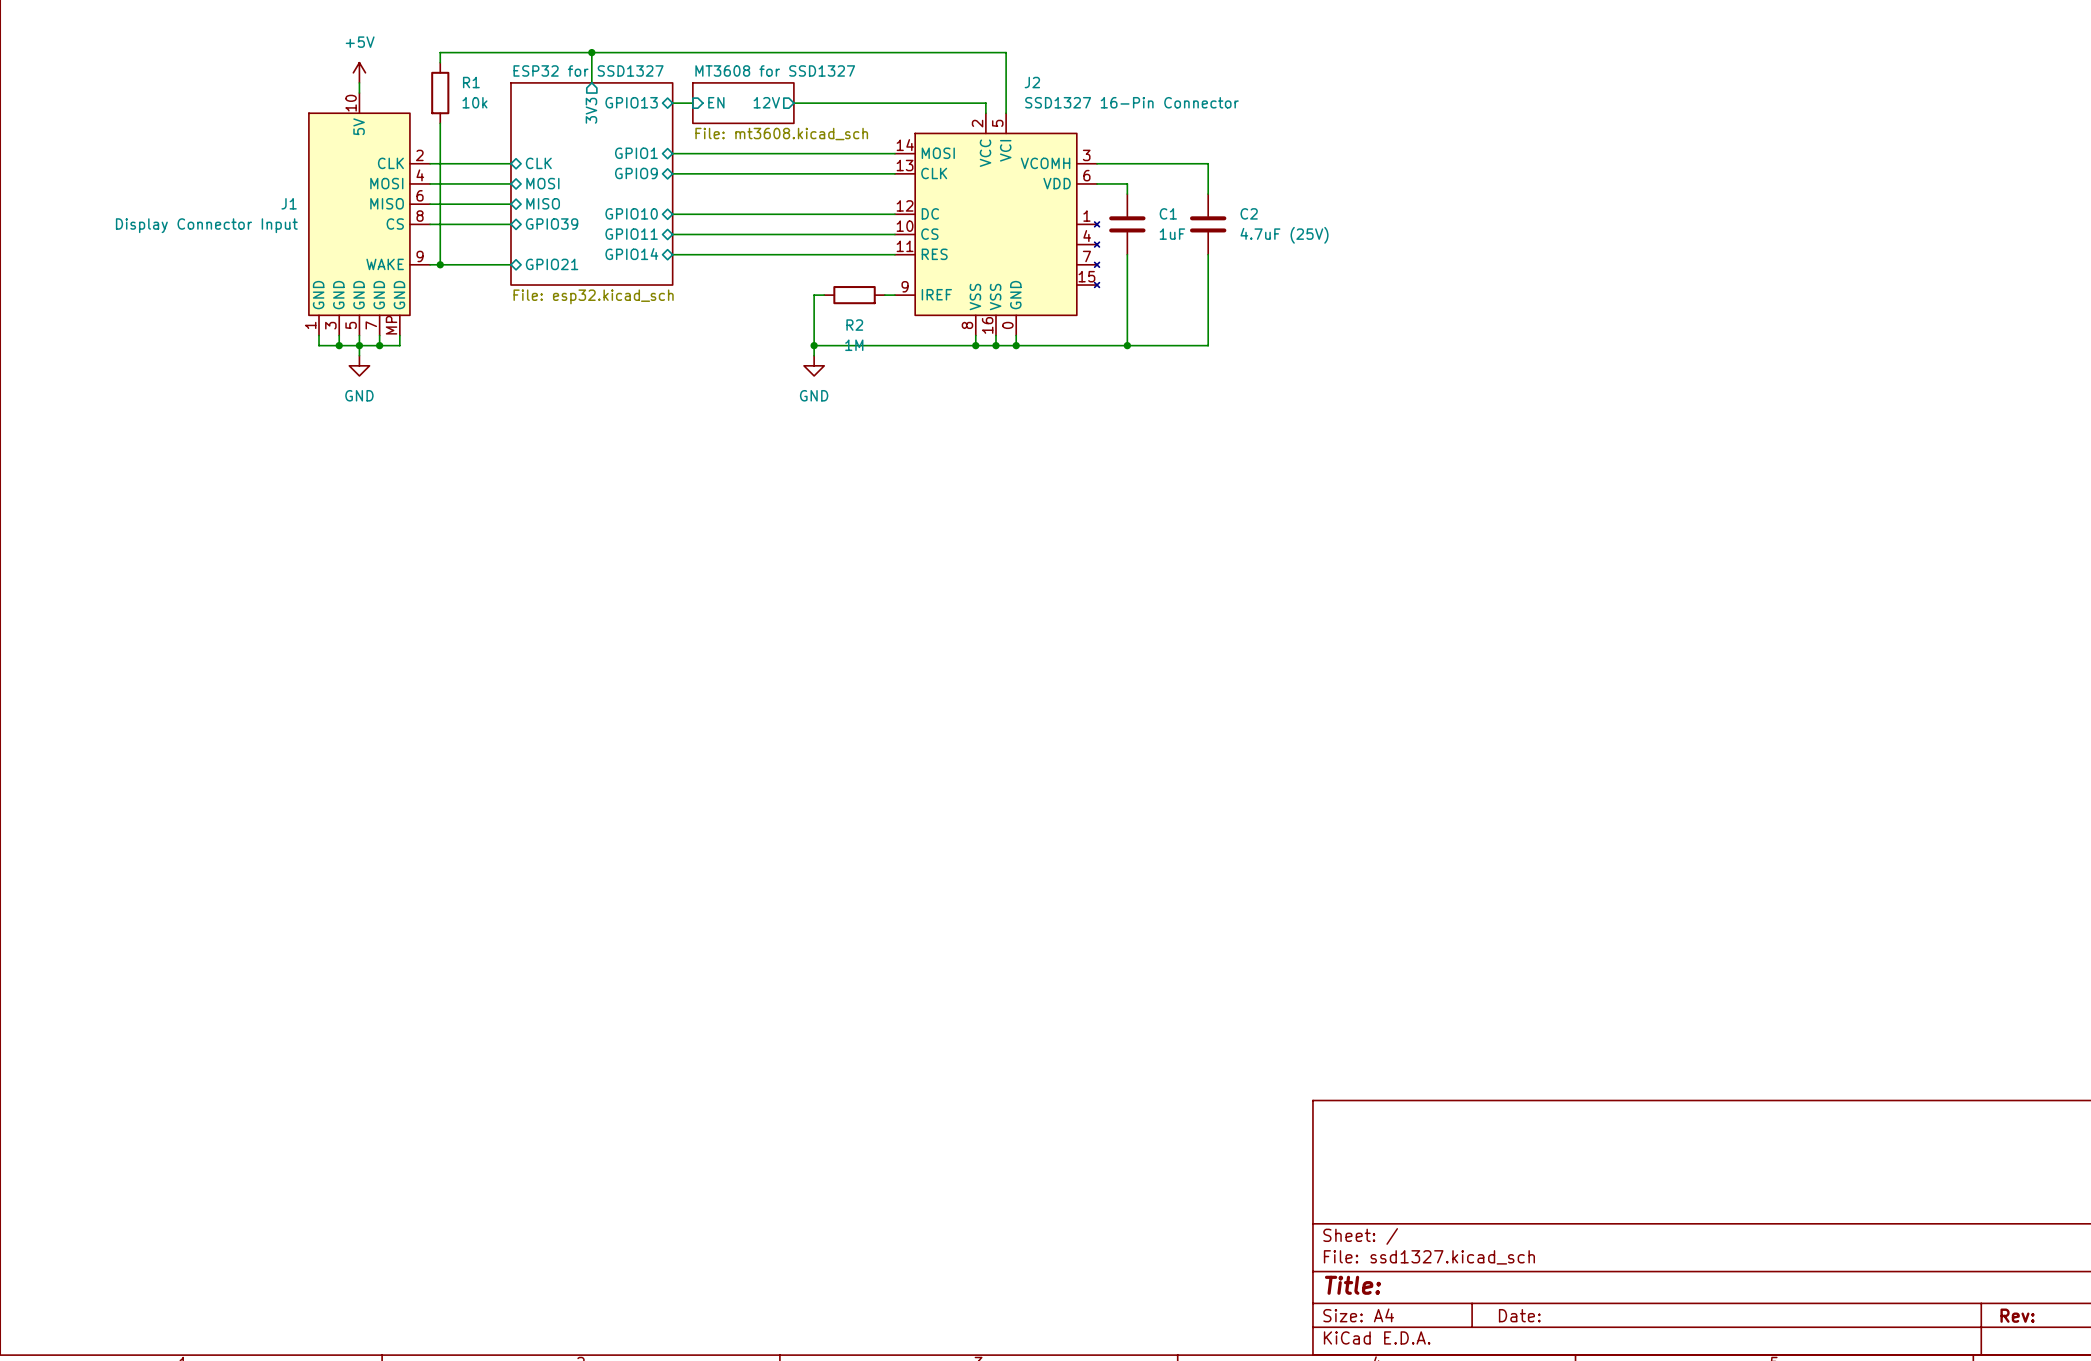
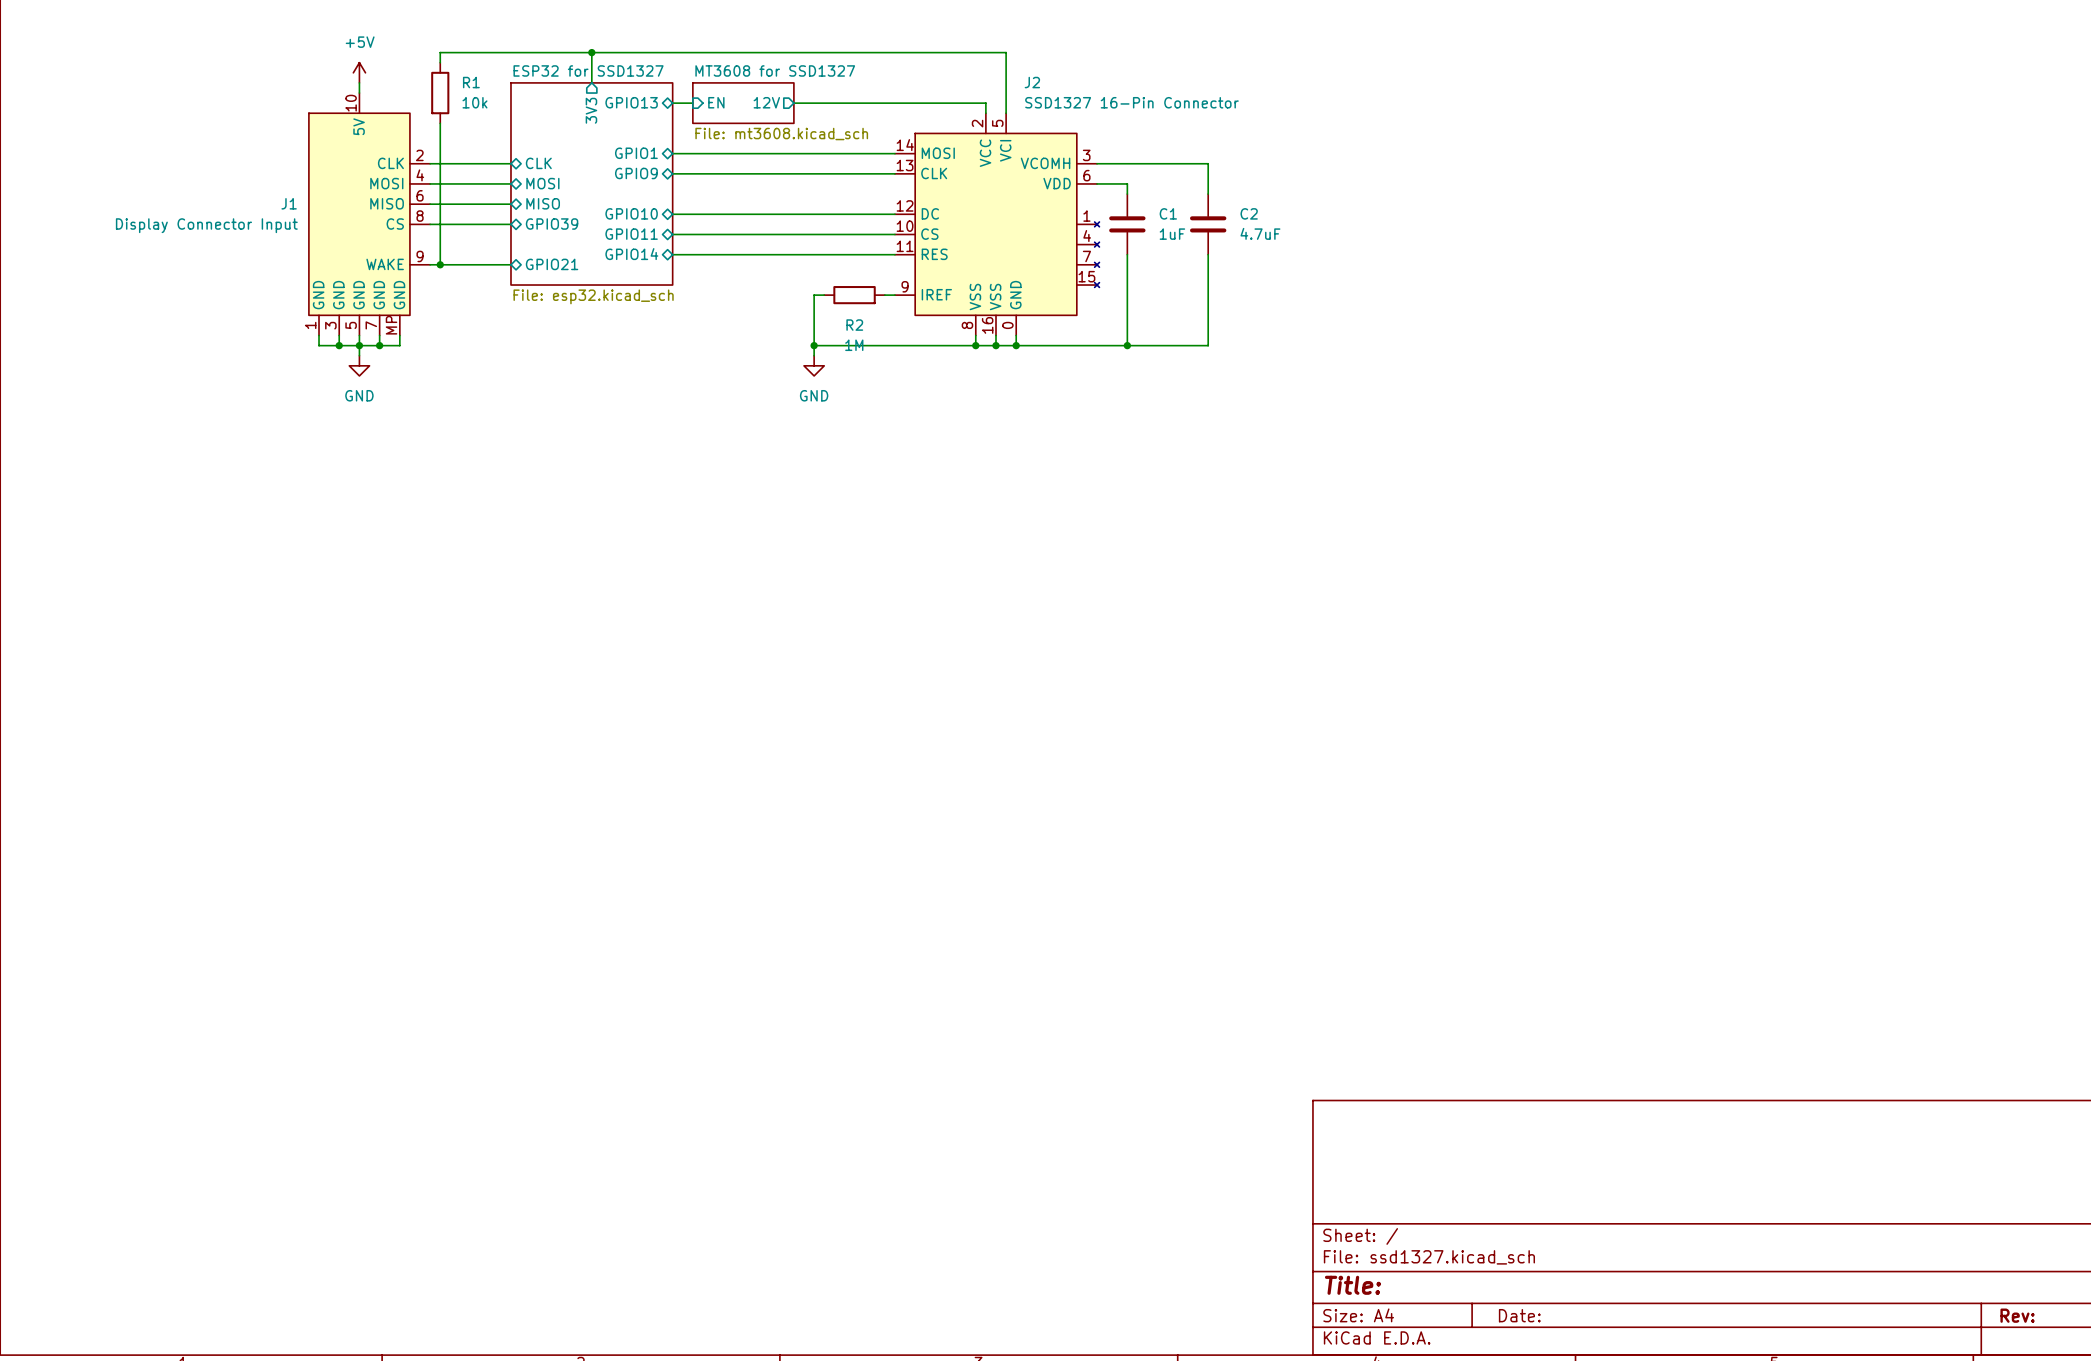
C2 value: 4.7uF (25V) (1284, 235) -> 4.7uF (1260, 233)

